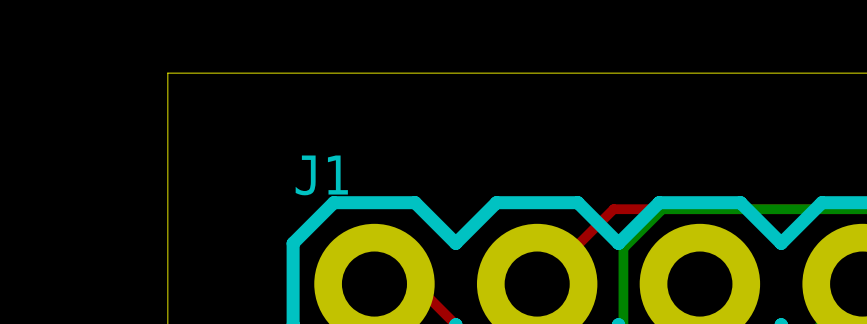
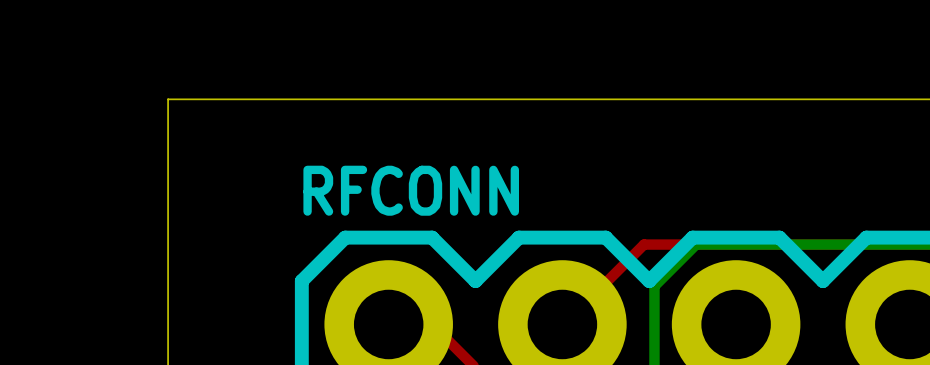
J1 name: J1 (321, 175) -> RFCONN (411, 190)

